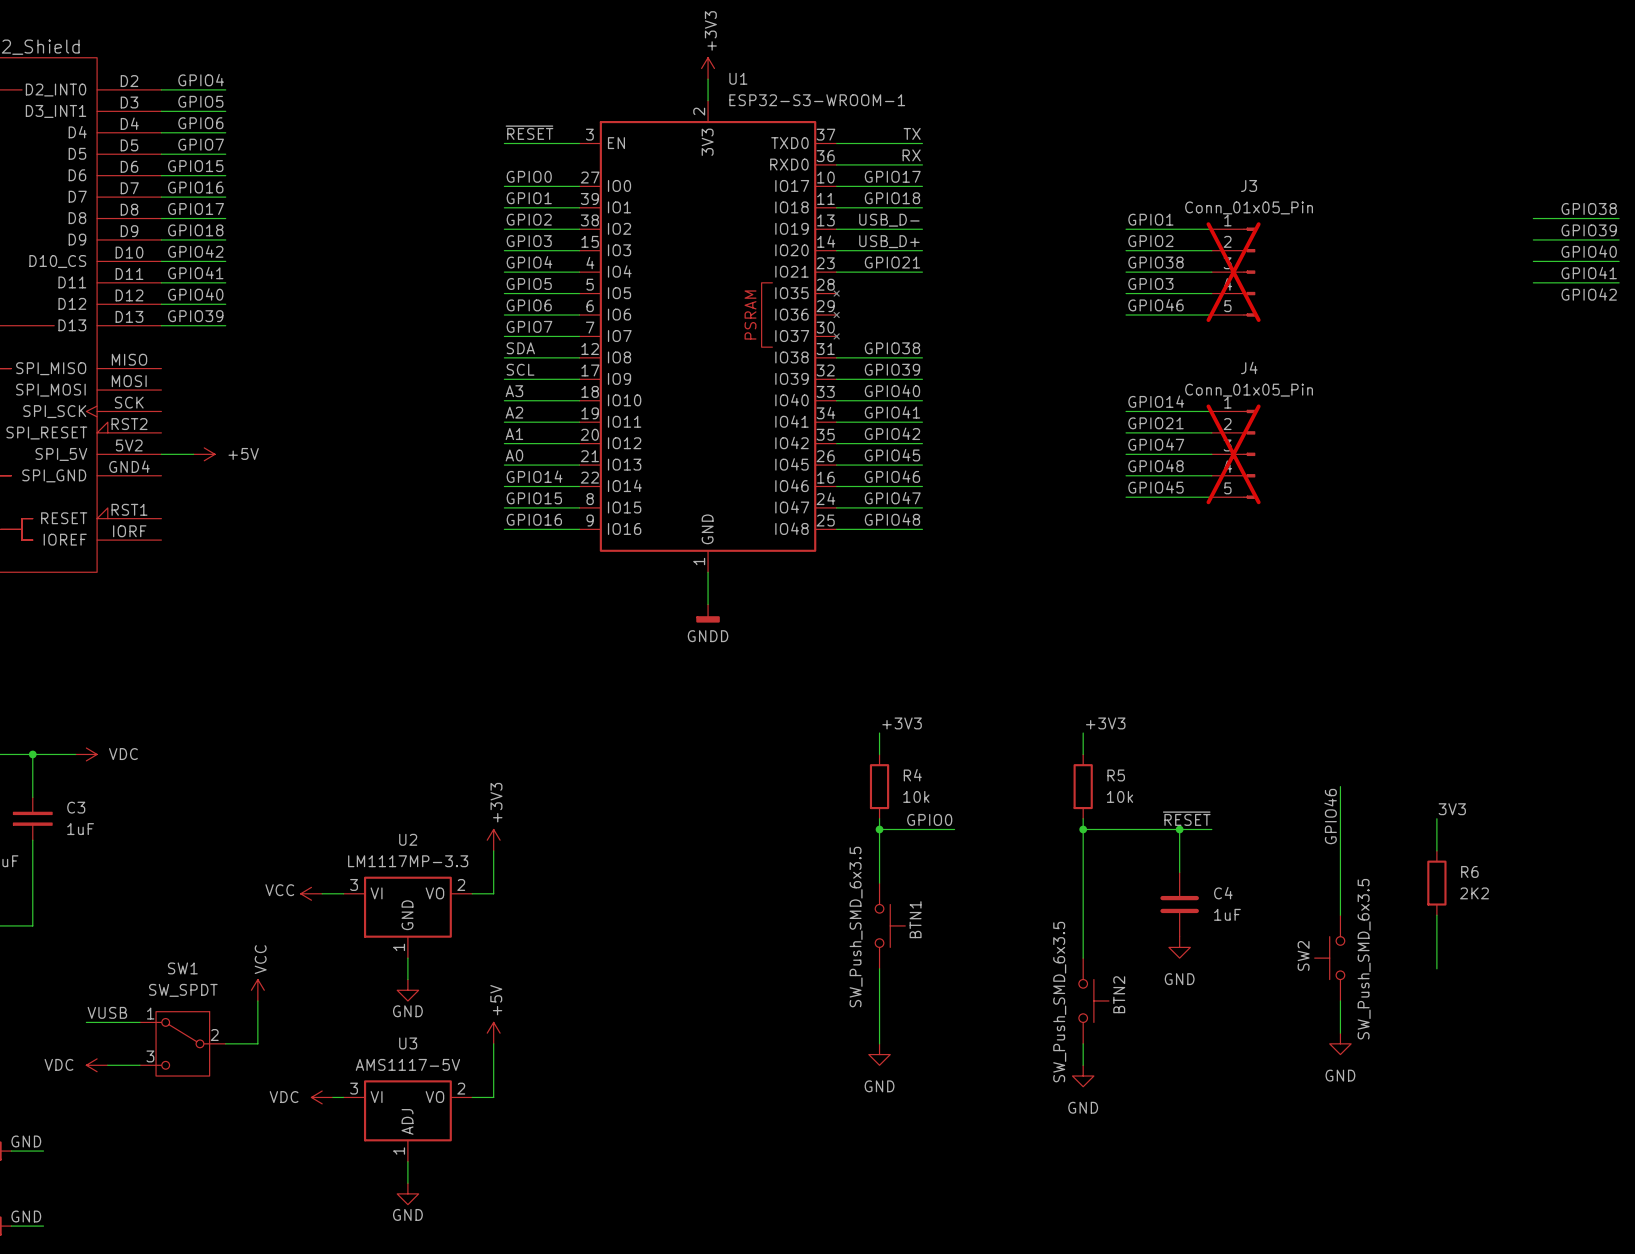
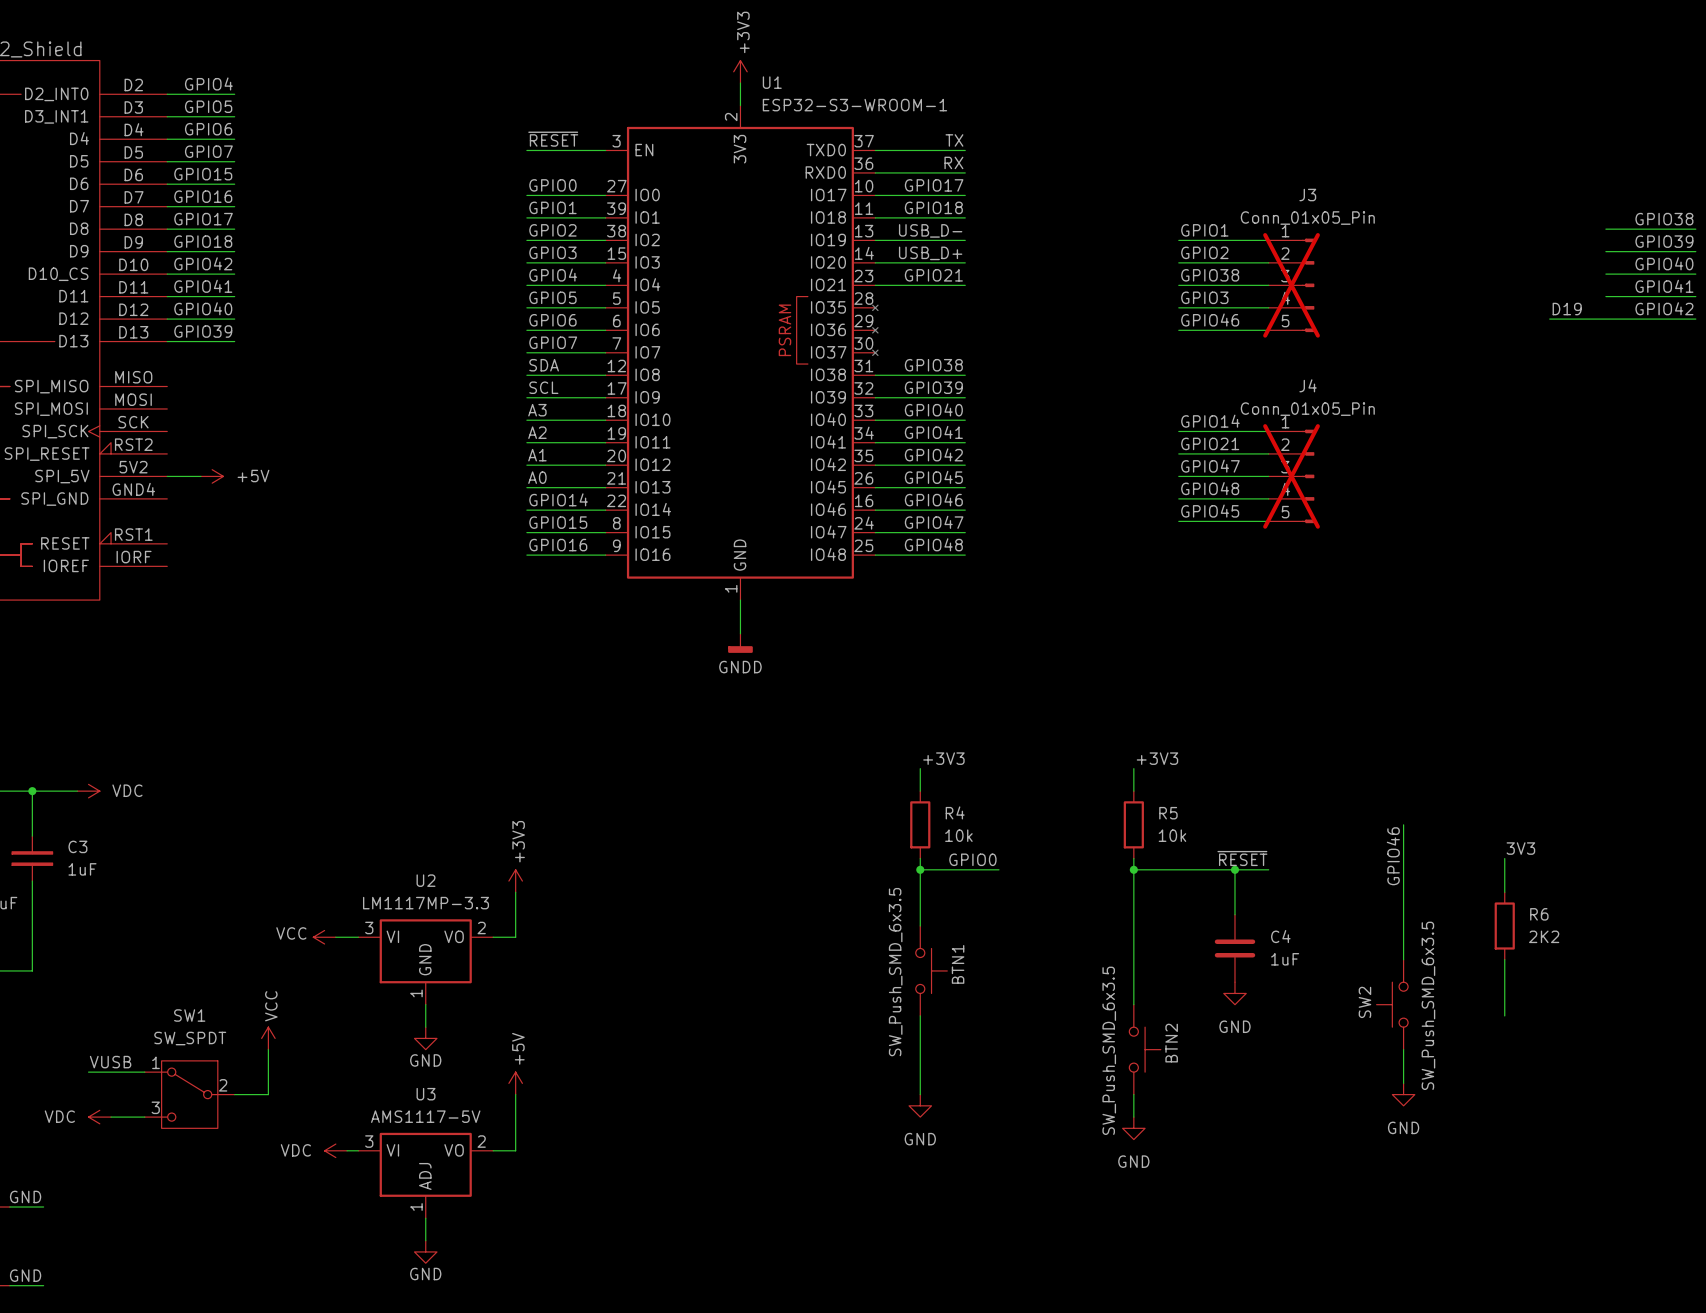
label: none -> D19 (1567, 309)
wire: none -> (1549, 319) (1695, 319)

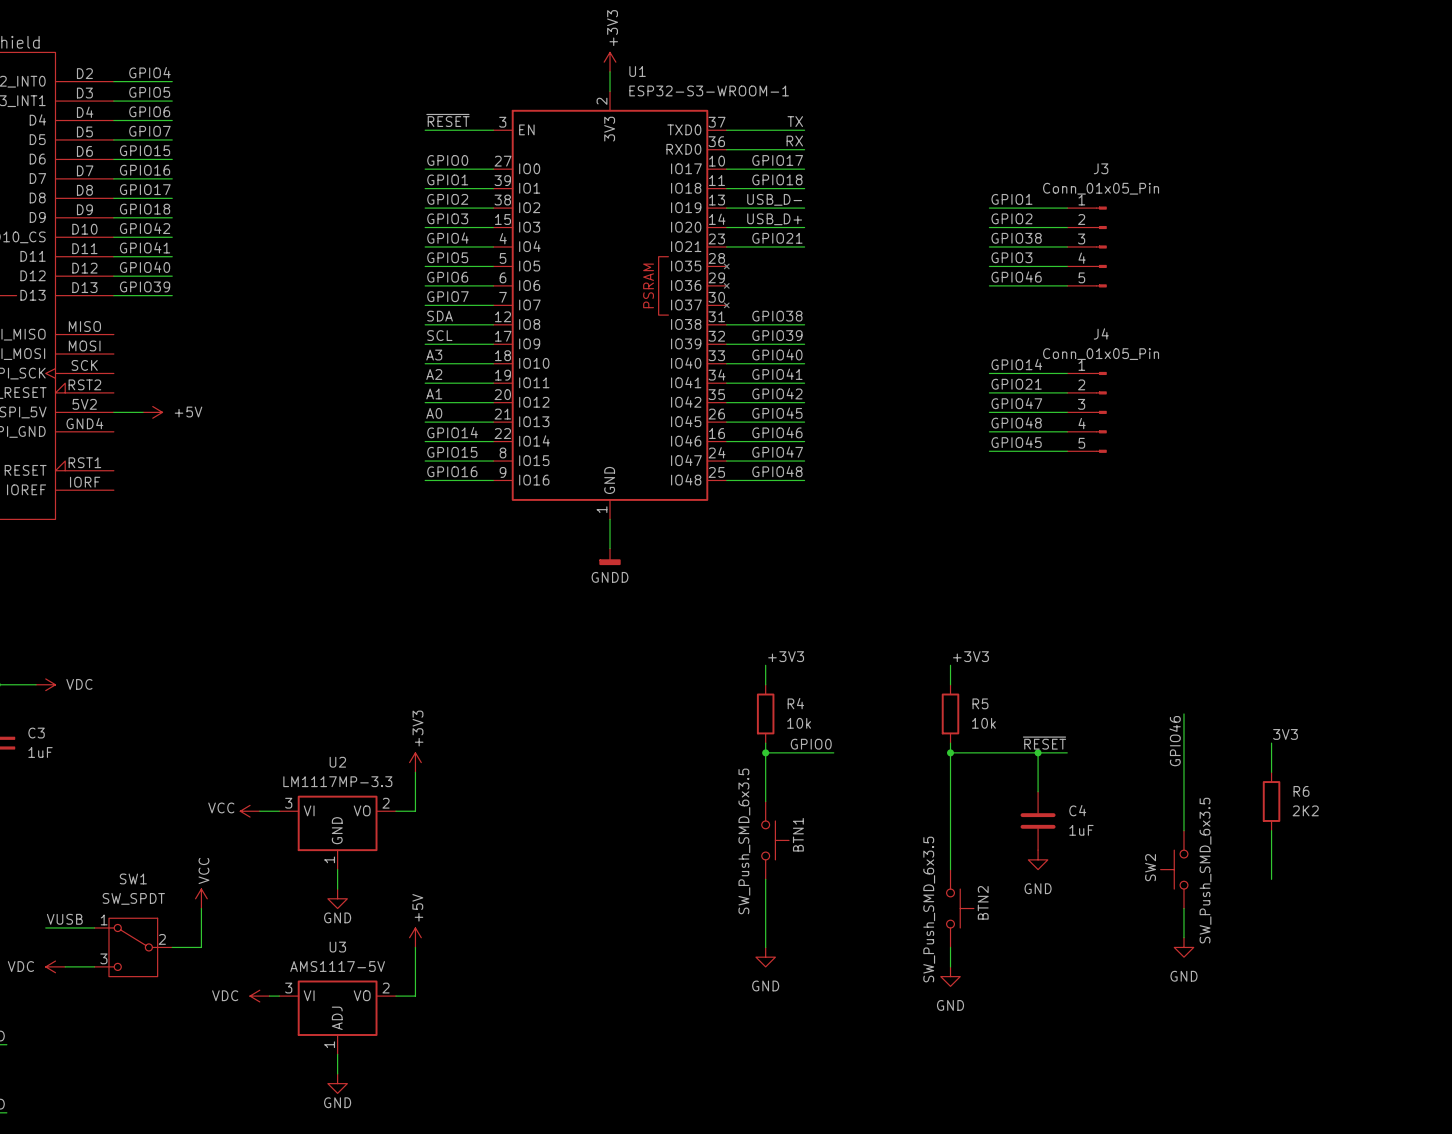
label: GPIO38 (1664, 219) -> none
wire: (1605, 229) (1695, 229) -> none
label: GPIO39 (1664, 241) -> none
wire: (1605, 251) (1695, 251) -> none
label: GPIO40 (1664, 263) -> none
wire: (1605, 274) (1695, 274) -> none
J3 do-not-place cross: (1291, 285) -> none
label: GPIO41 (1664, 286) -> none
wire: (1605, 296) (1695, 296) -> none
label: GPIO42 (1664, 308) -> none
label: D19 (1567, 309) -> none
wire: (1549, 319) (1695, 319) -> none
J4 do-not-place cross: (1291, 476) -> none

